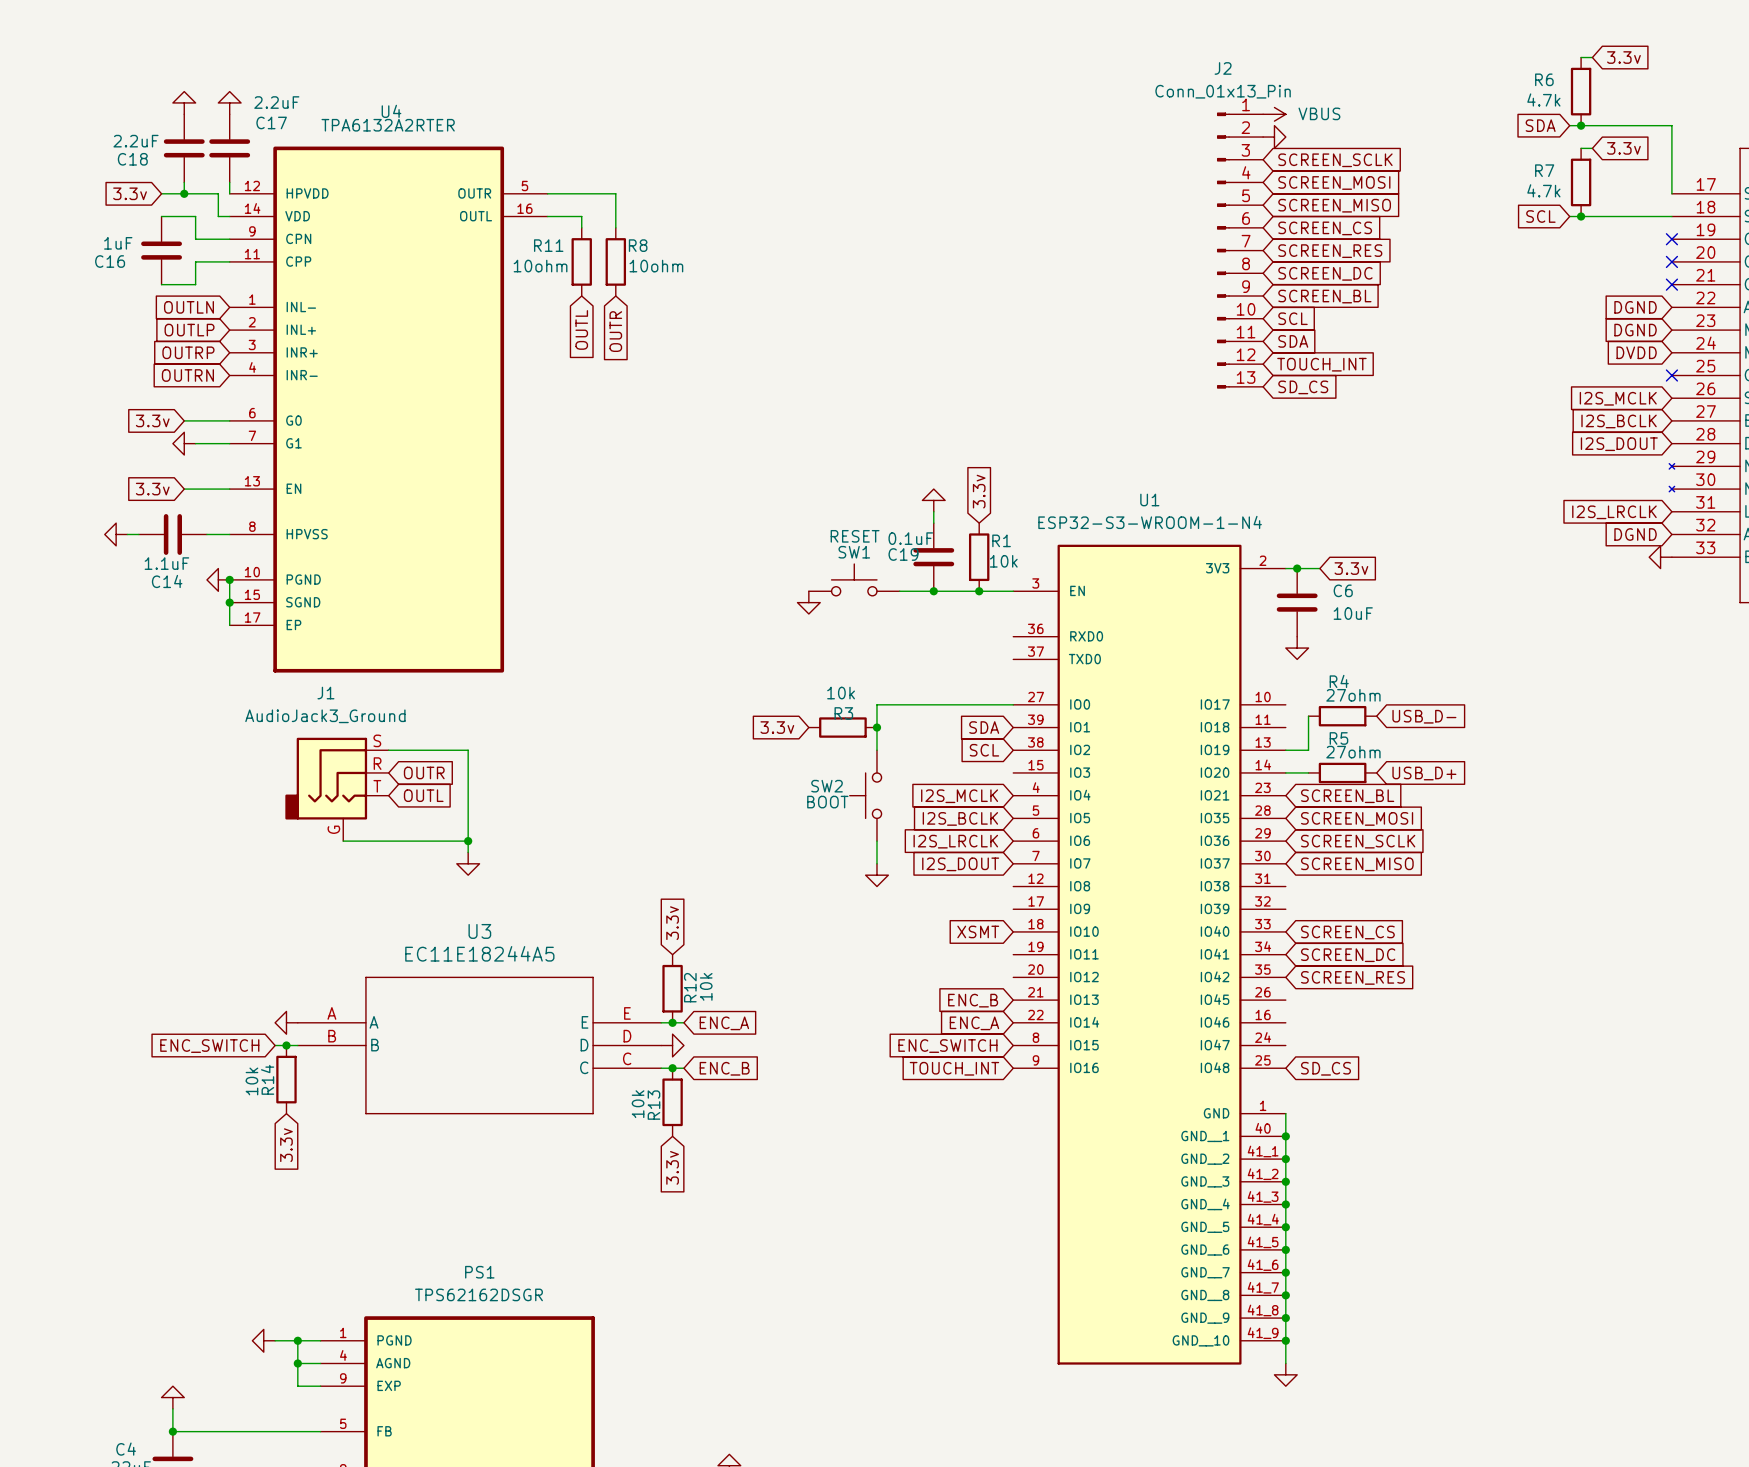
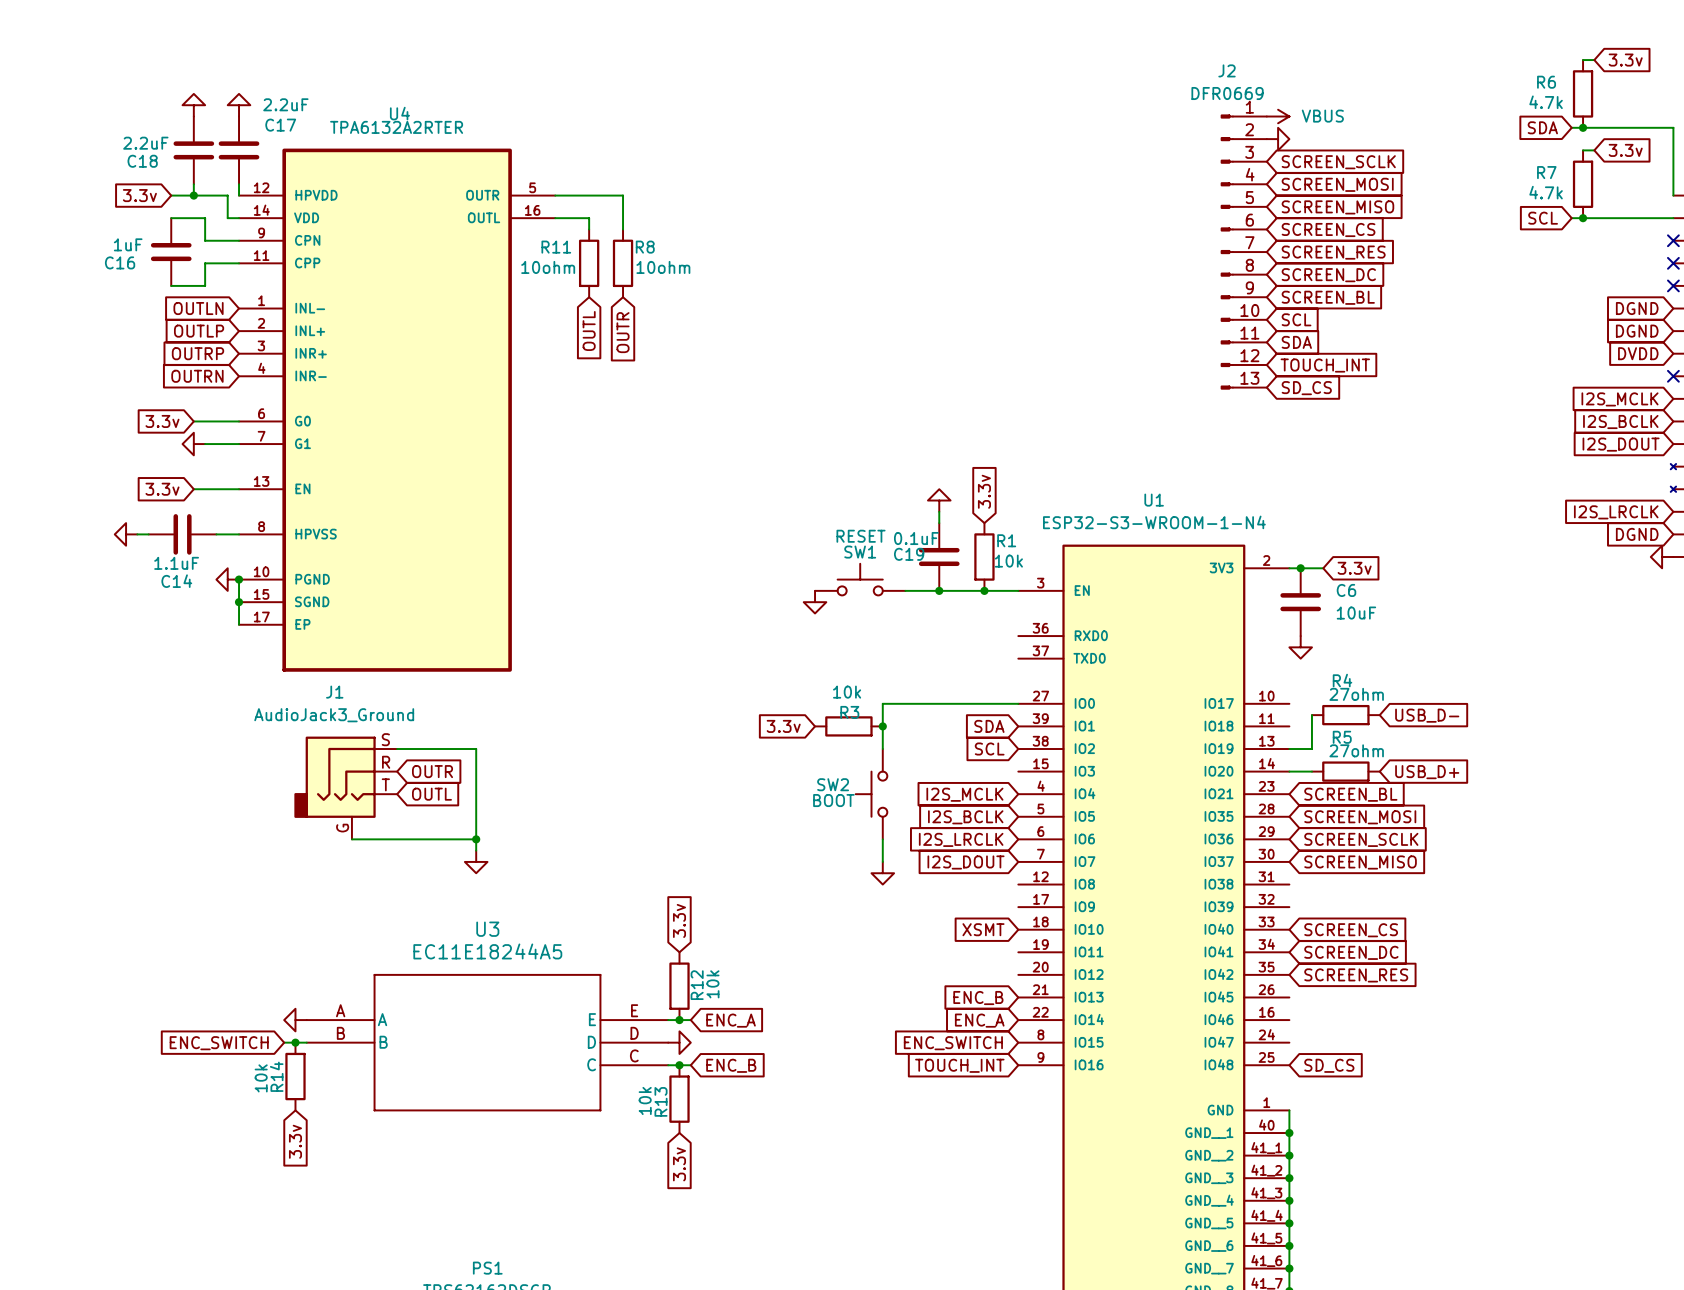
J2 value: Conn_01x13_Pin (1223, 91) -> DFR0669 (1227, 93)

